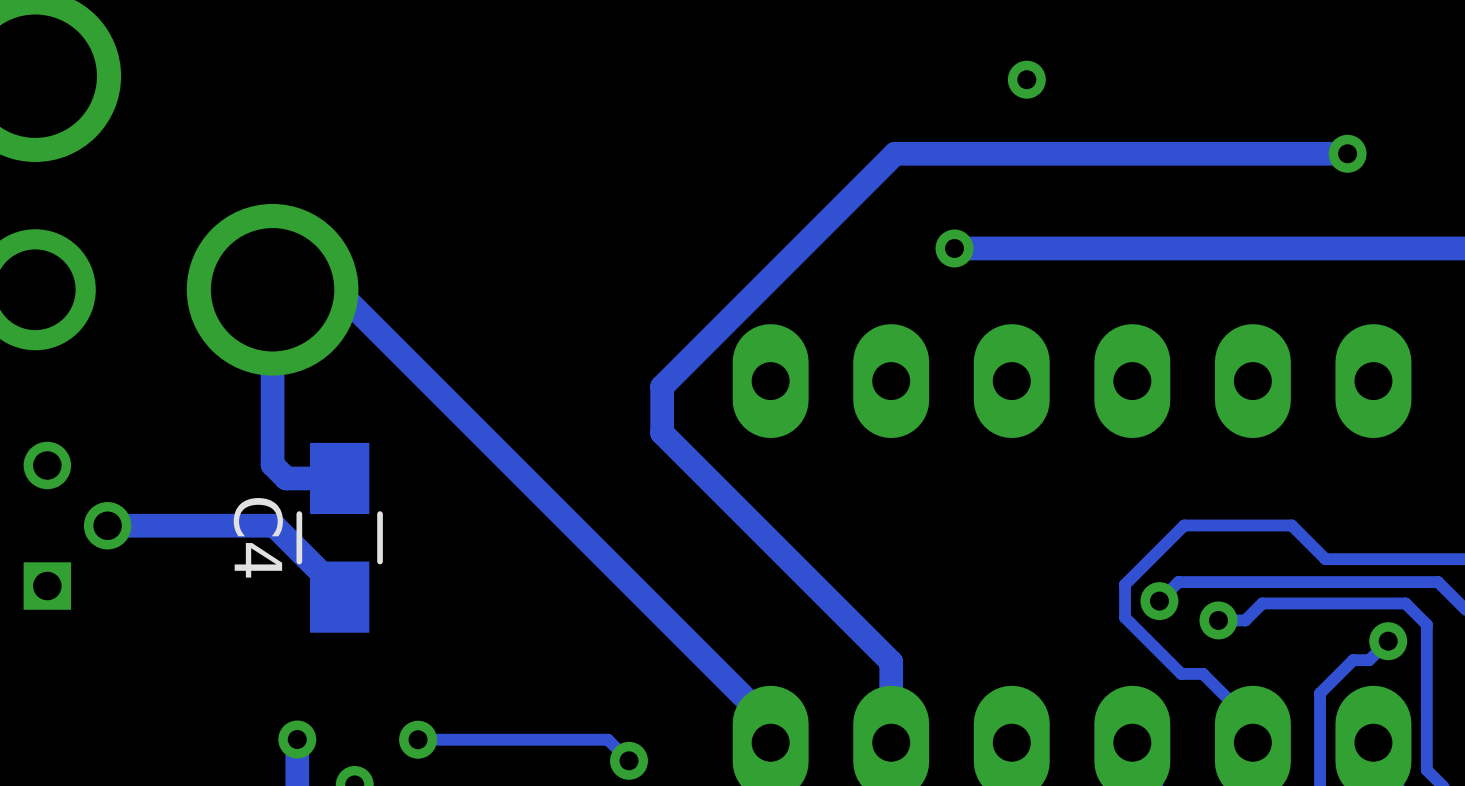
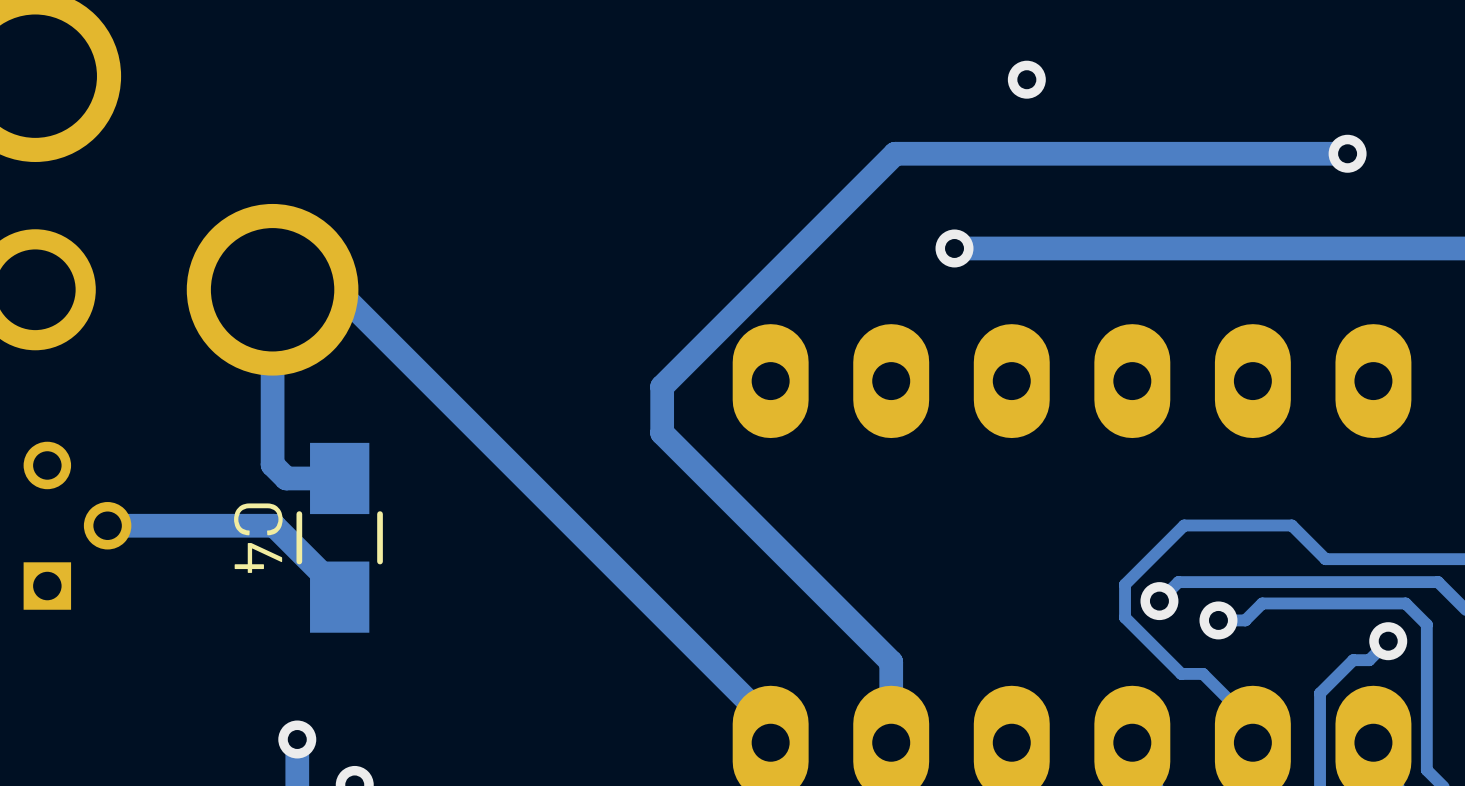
track: (418, 739) (607, 739) (629, 760) -> none
via: (418, 739) -> none
via: (629, 760) -> none

